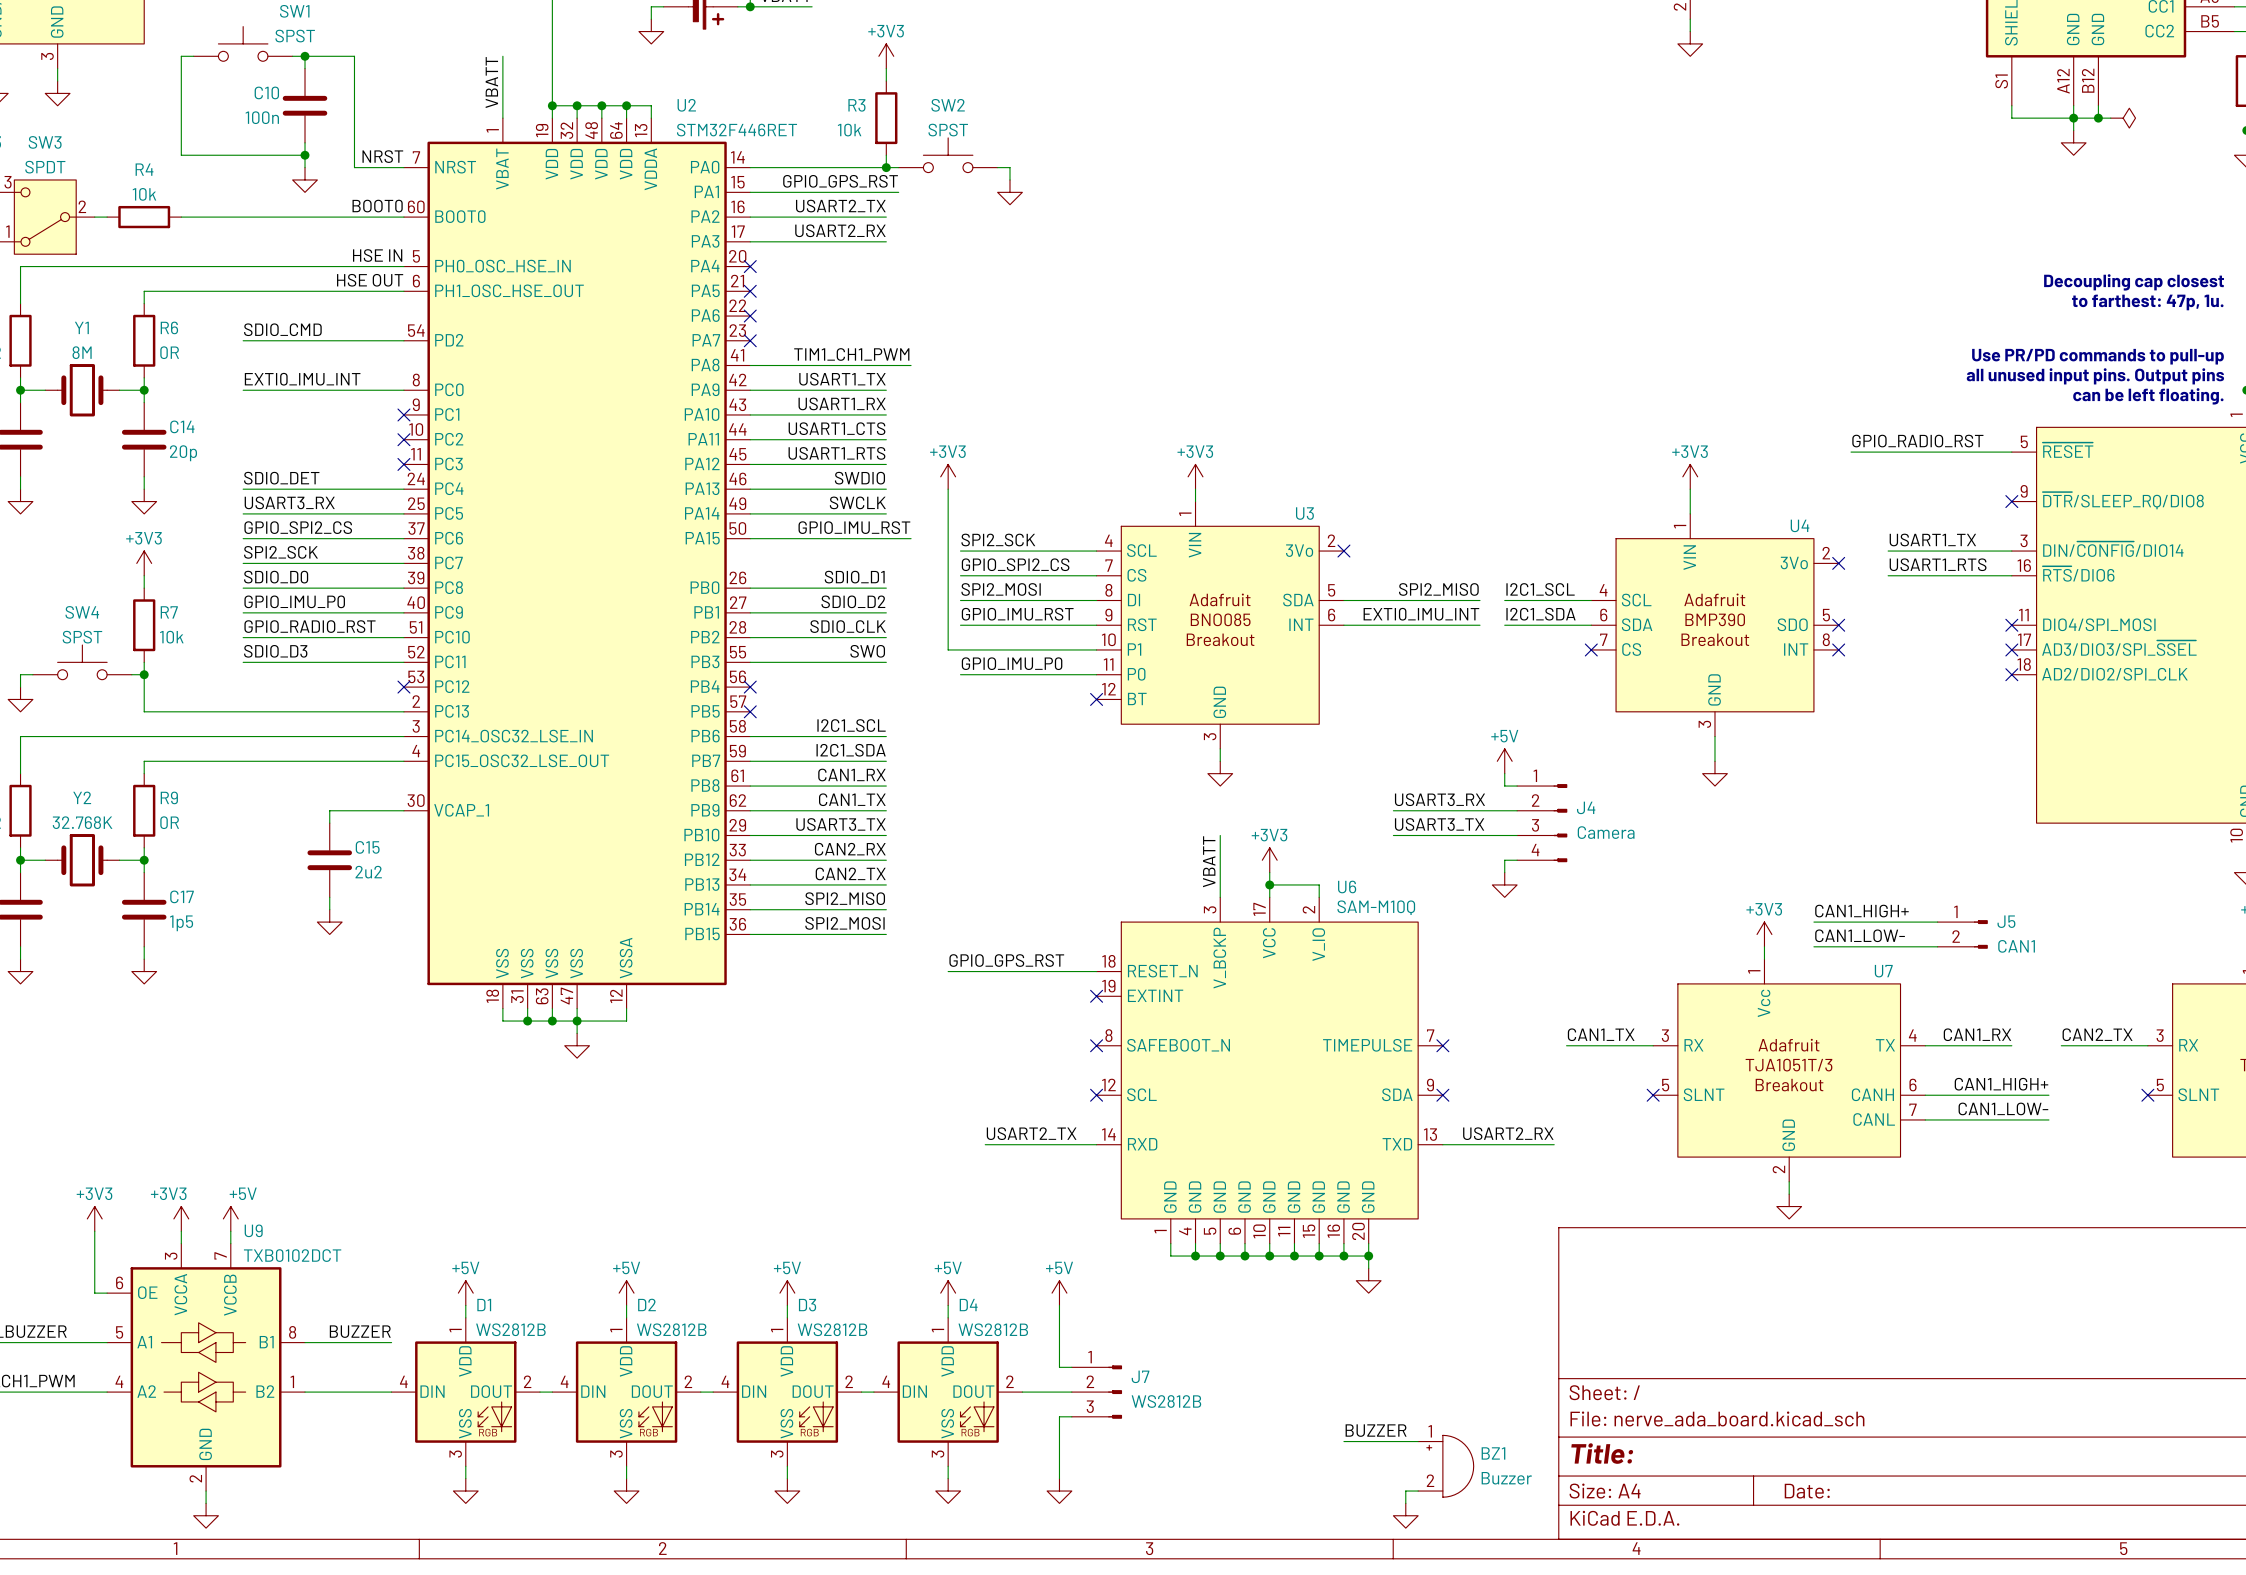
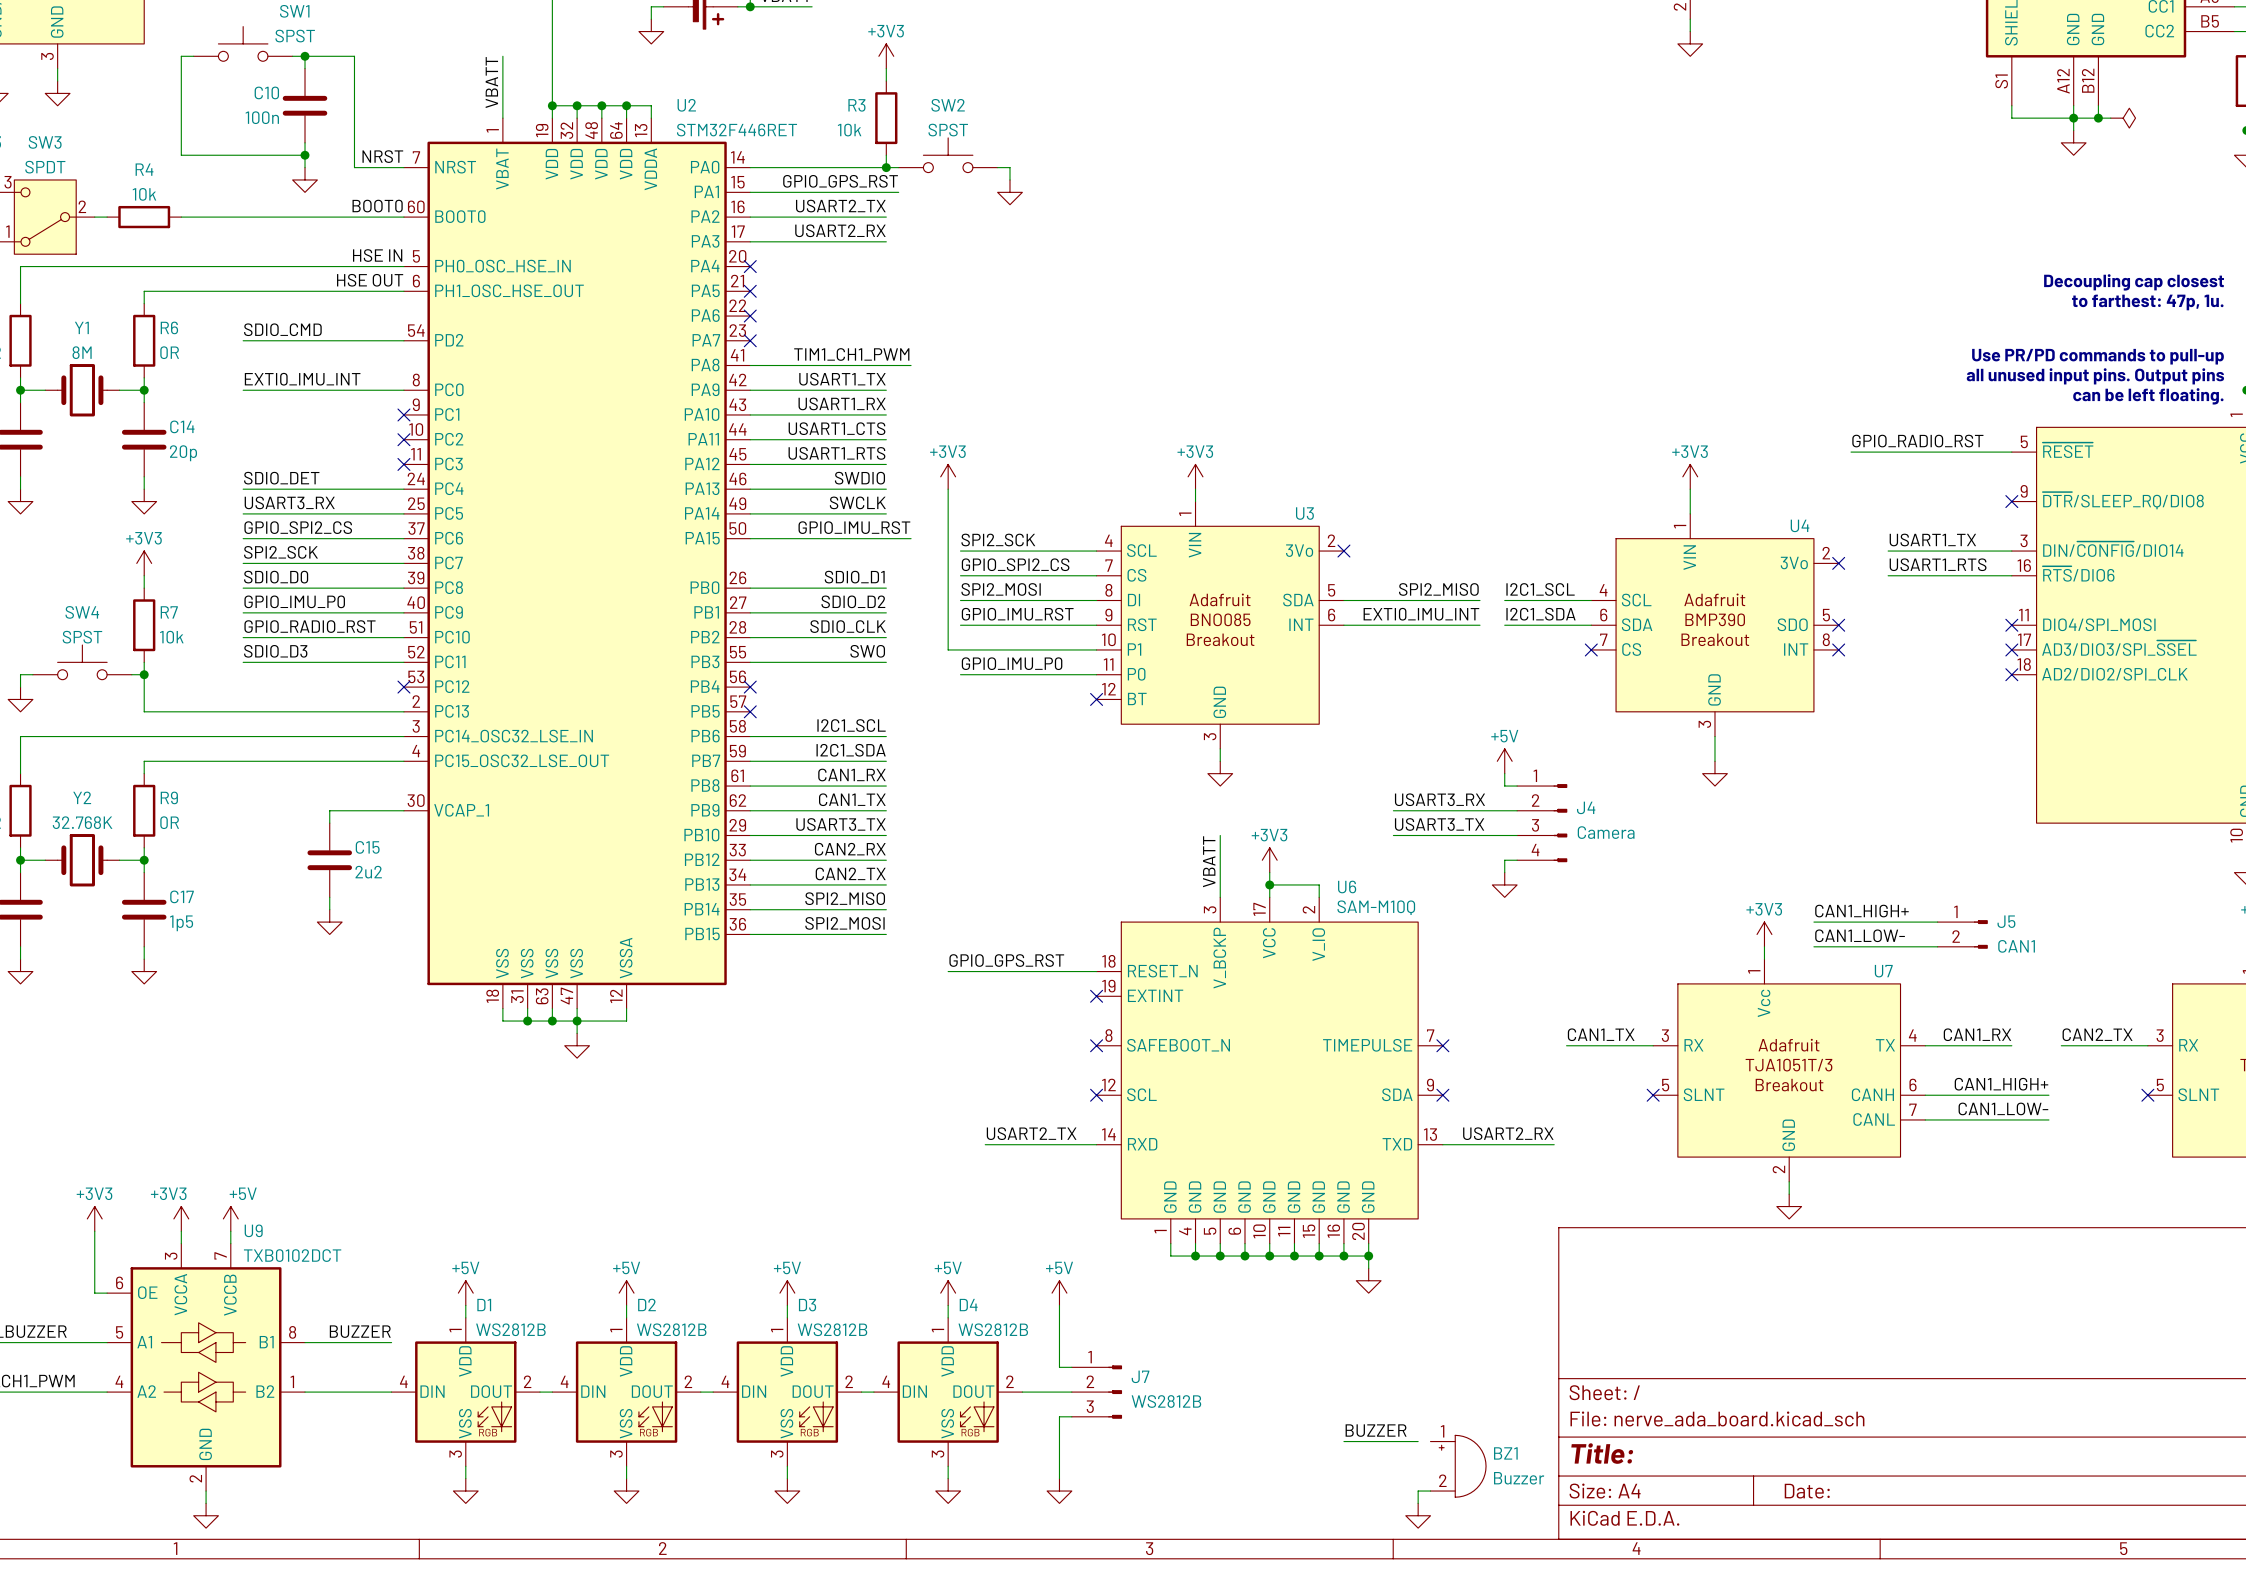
BZ1 position: (1445, 1466) -> (1458, 1466)
wire: (1418, 1491) (1405, 1491) (1405, 1503) -> (1430, 1491) (1418, 1491) (1418, 1503)
power symbol position: (1405, 1515) -> (1418, 1515)

